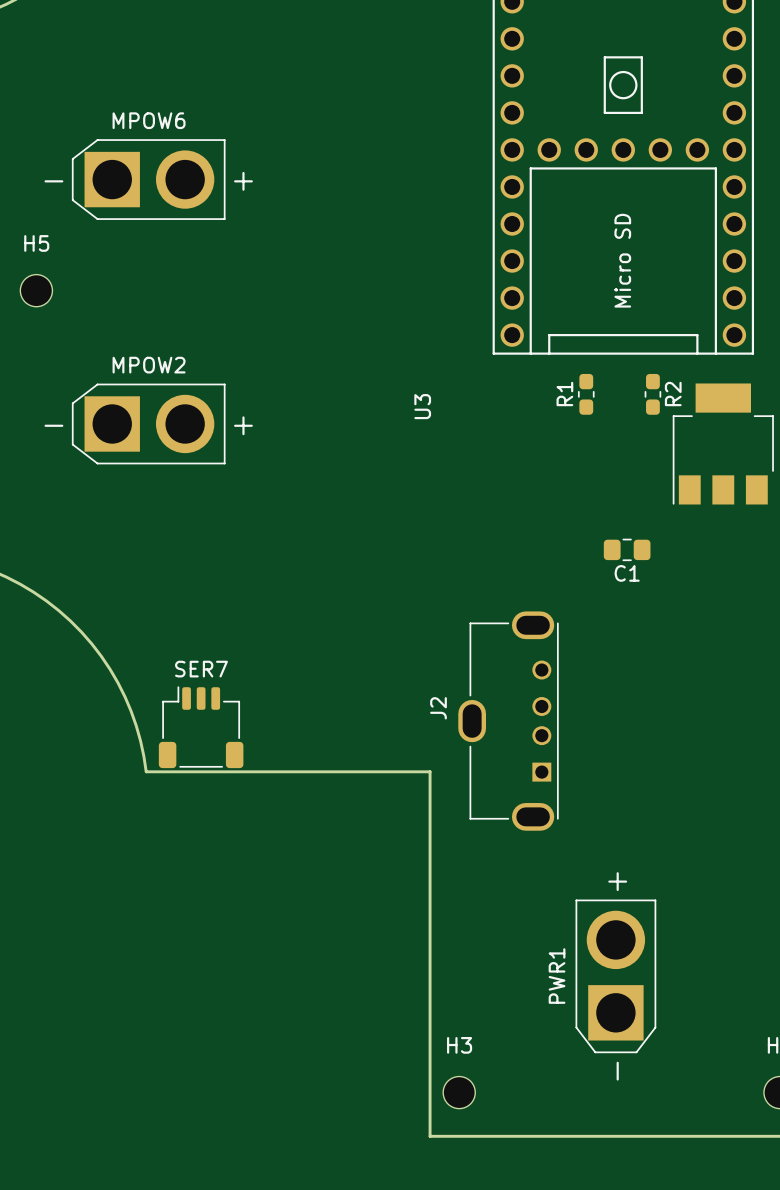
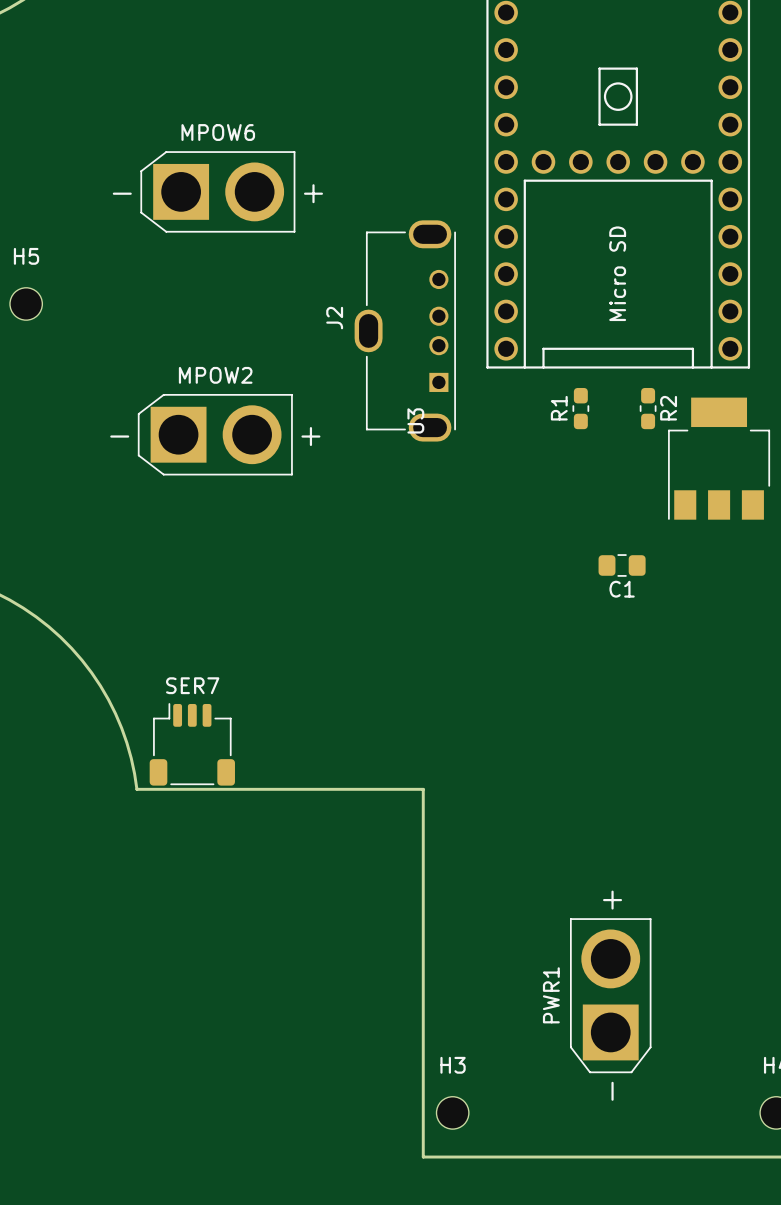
MPOW6 position: (148, 179) -> (217, 191)
MPOW2 position: (148, 423) -> (215, 434)
J2 position: (508, 721) -> (405, 330)

